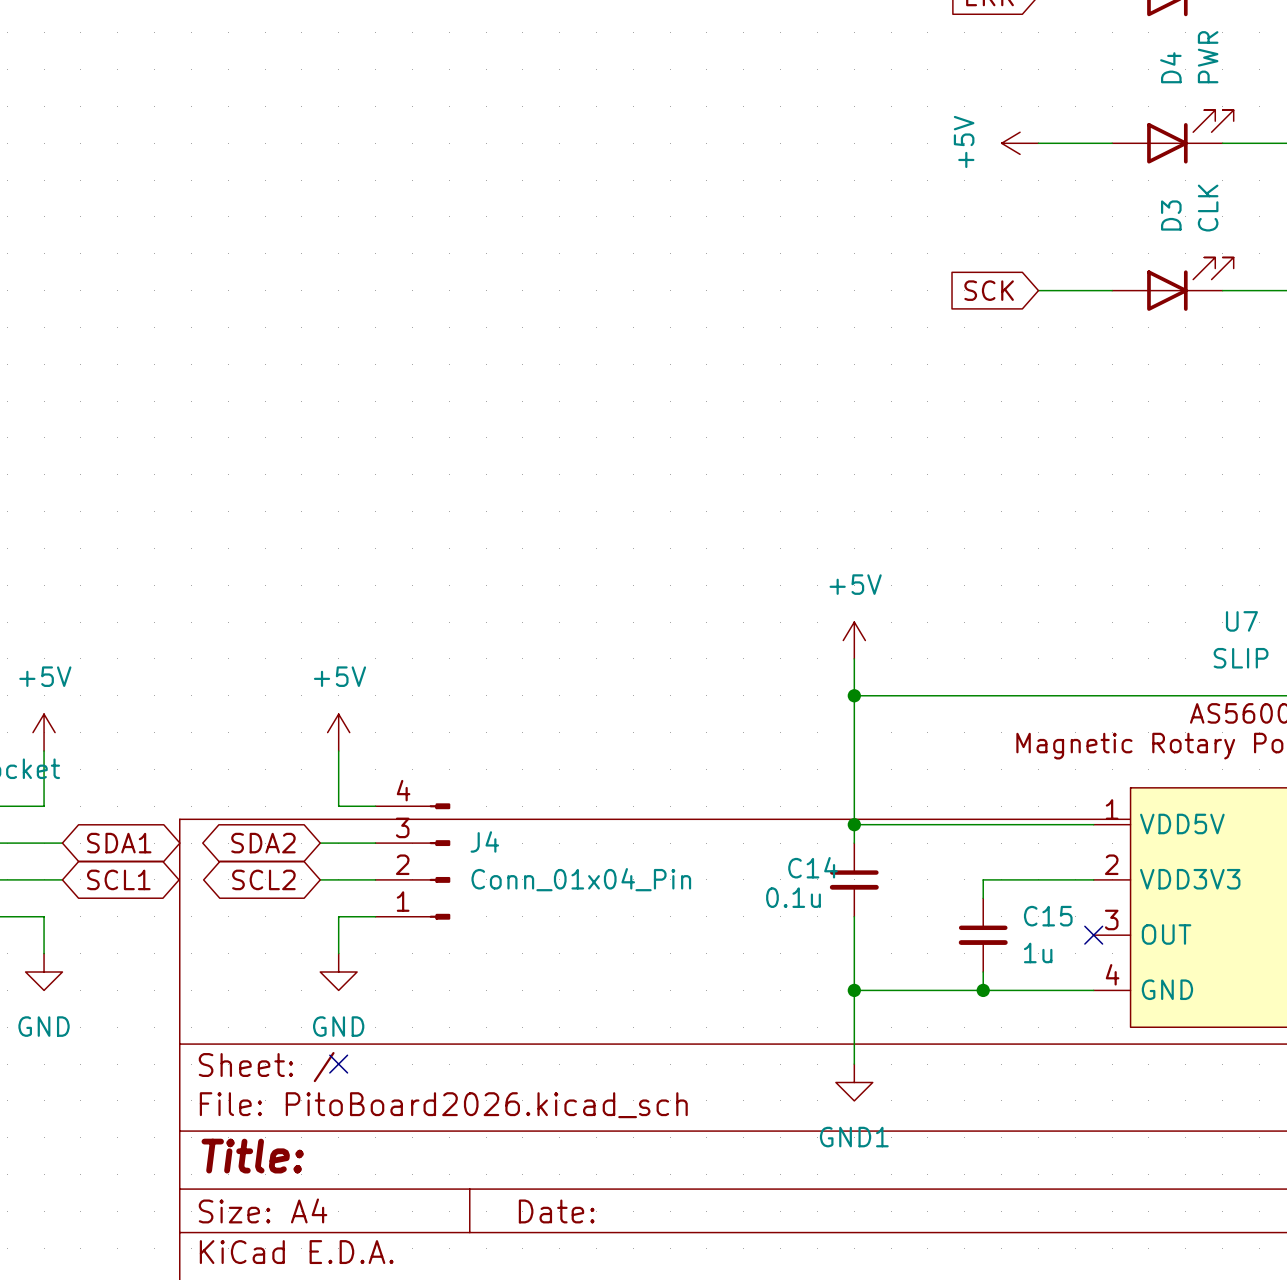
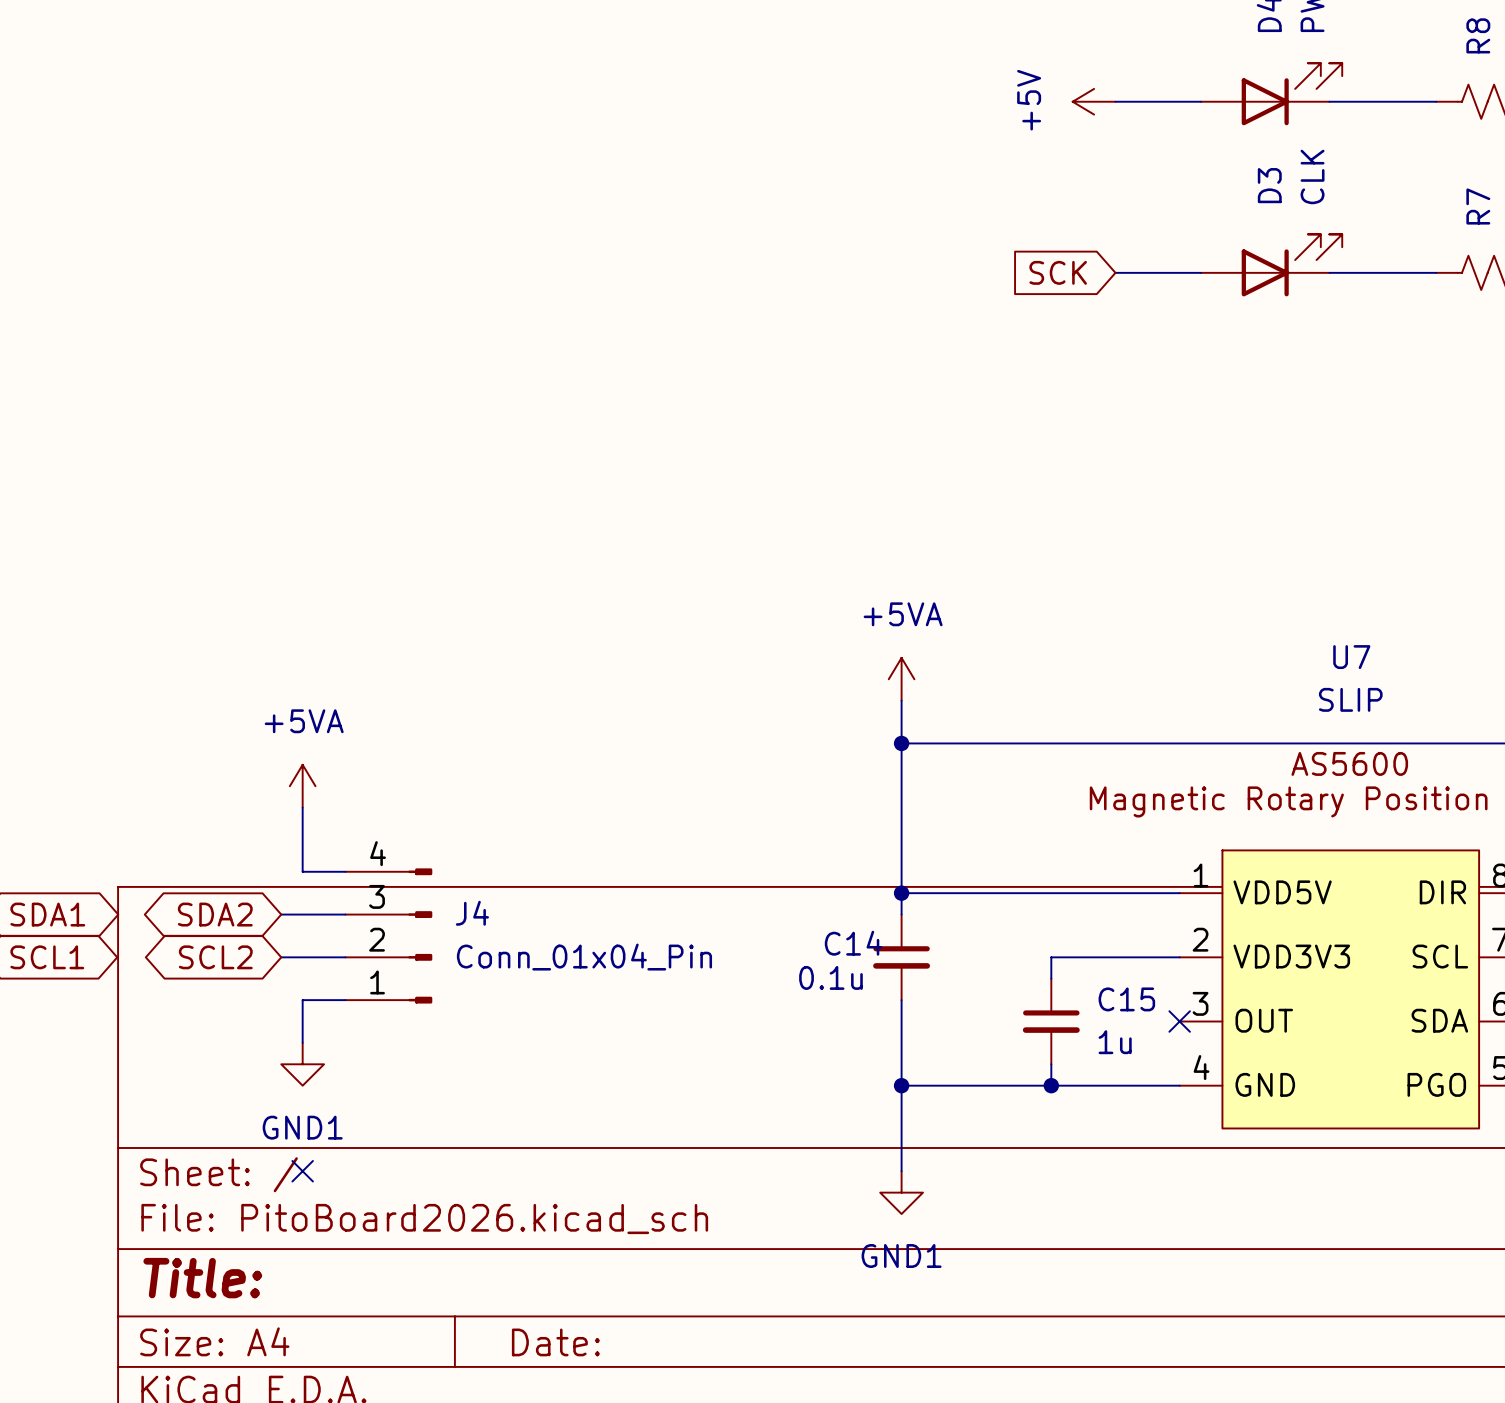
power symbol: +5V (854, 640) -> +5VA (901, 679)
power symbol: +5V (338, 732) -> +5VA (302, 786)
power symbol: GND (338, 972) -> GND1 (302, 1064)

